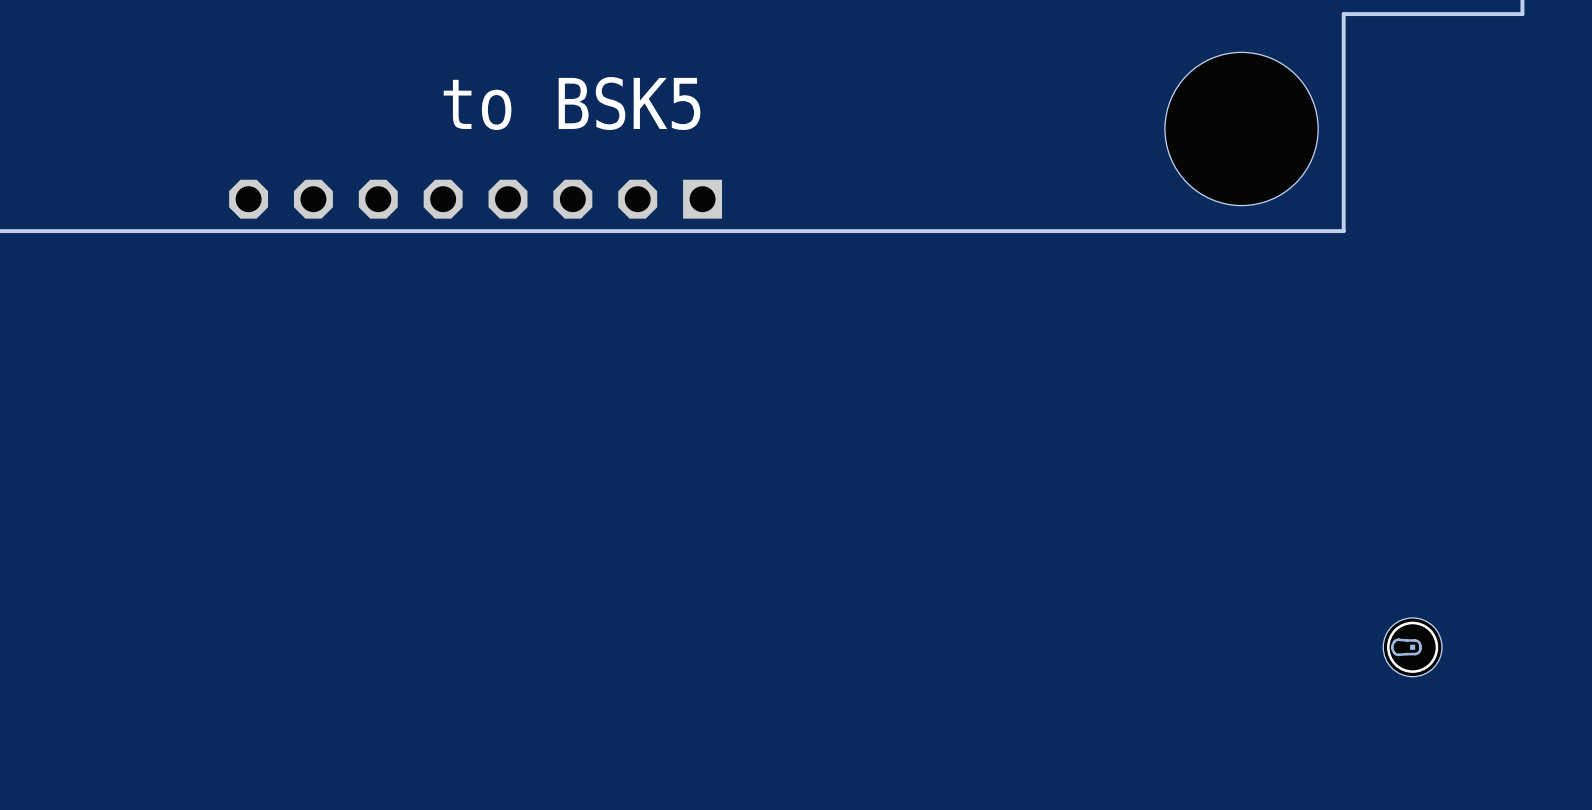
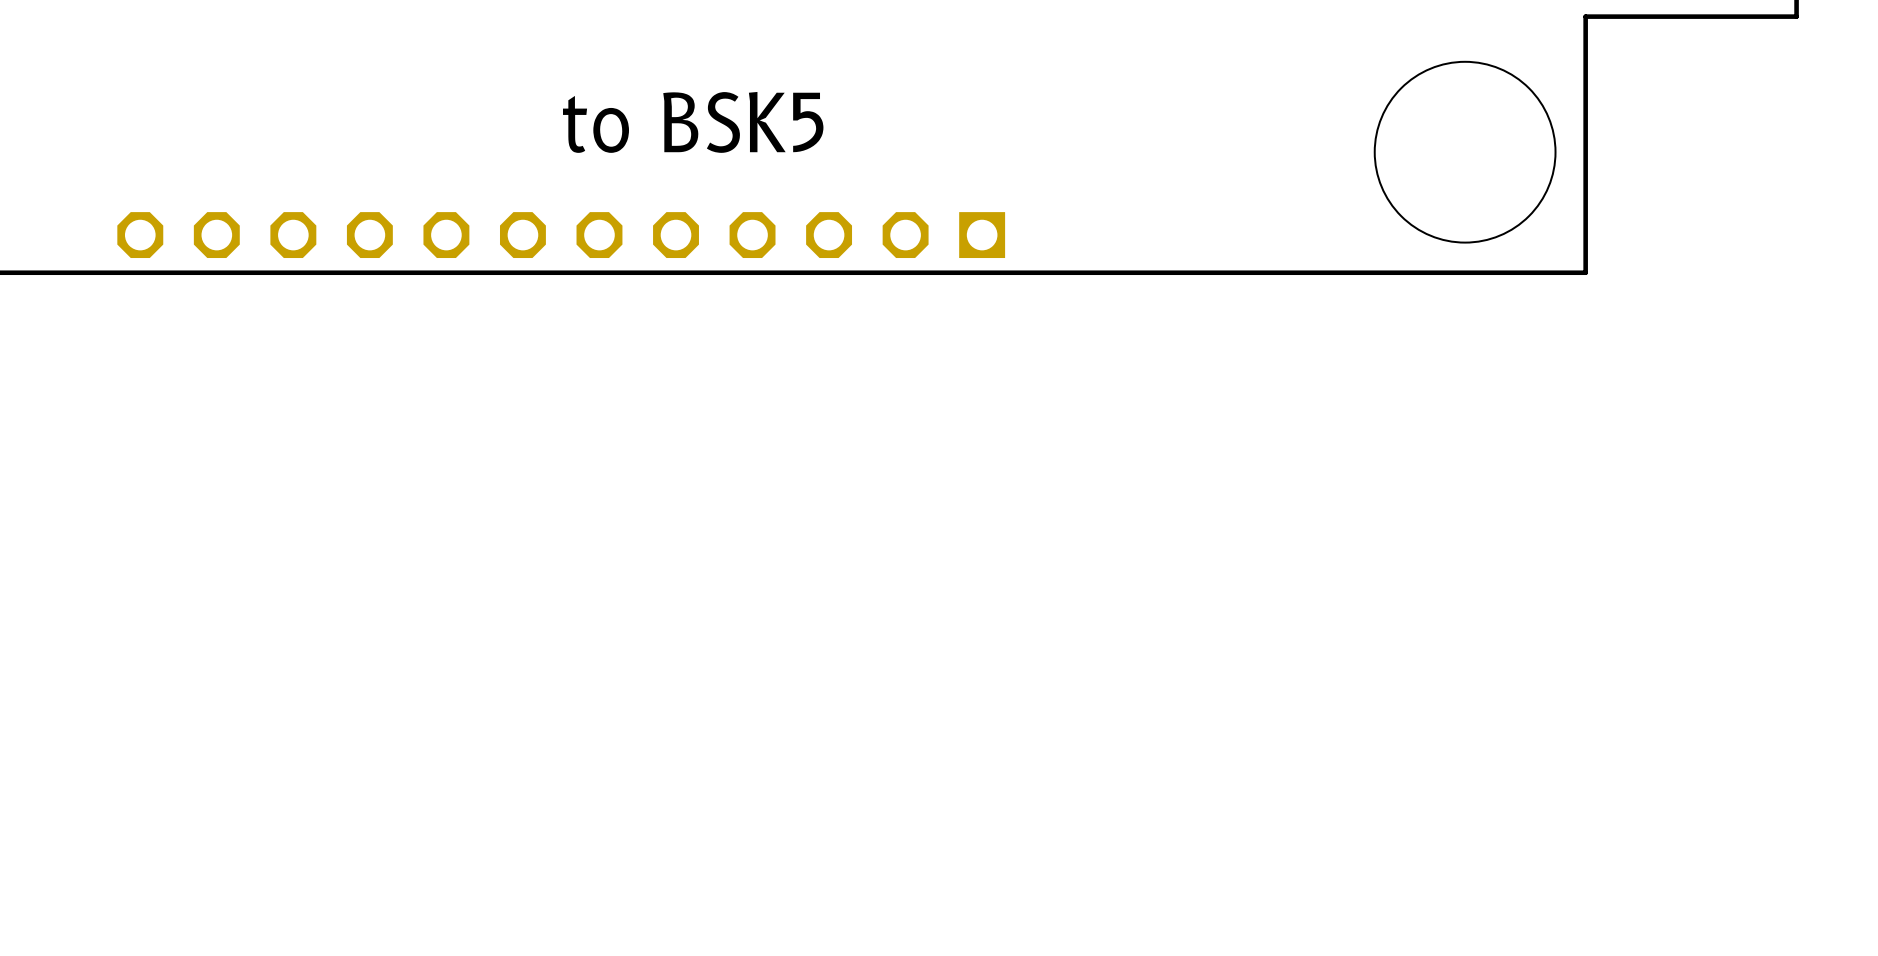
part footprint: [229, 179, 723, 219] -> [117, 212, 1006, 259]
part: (1412, 647) -> none

